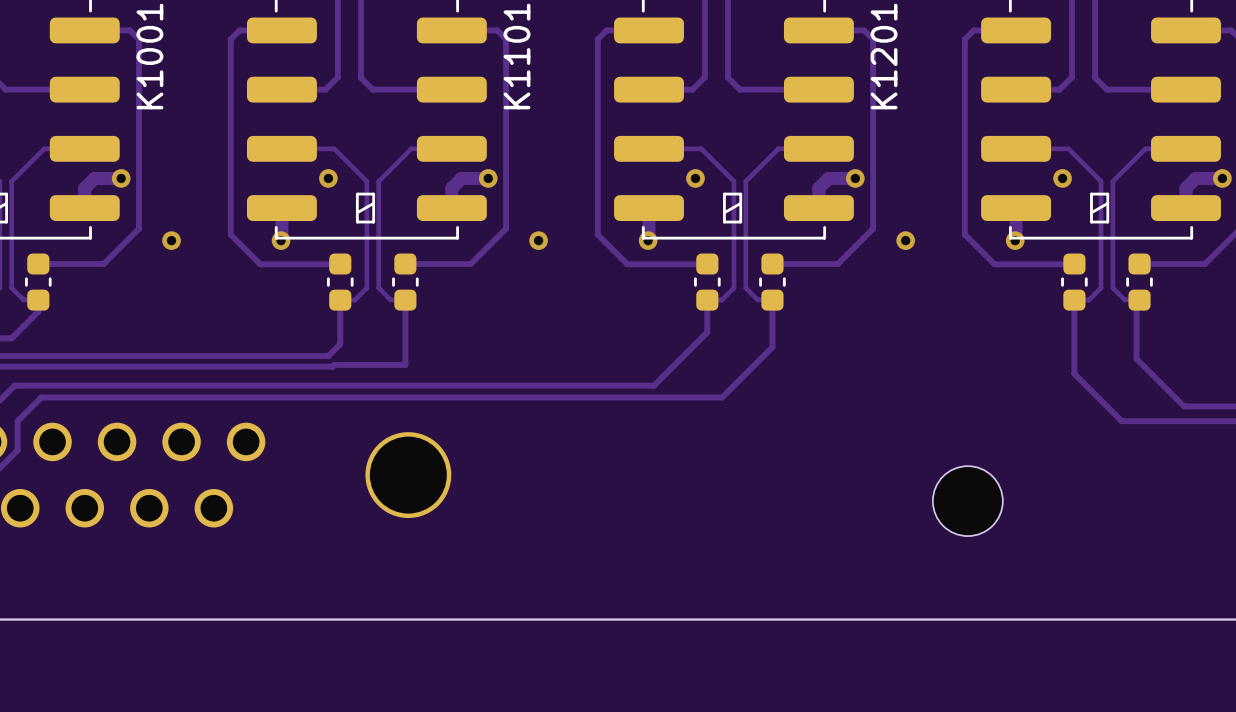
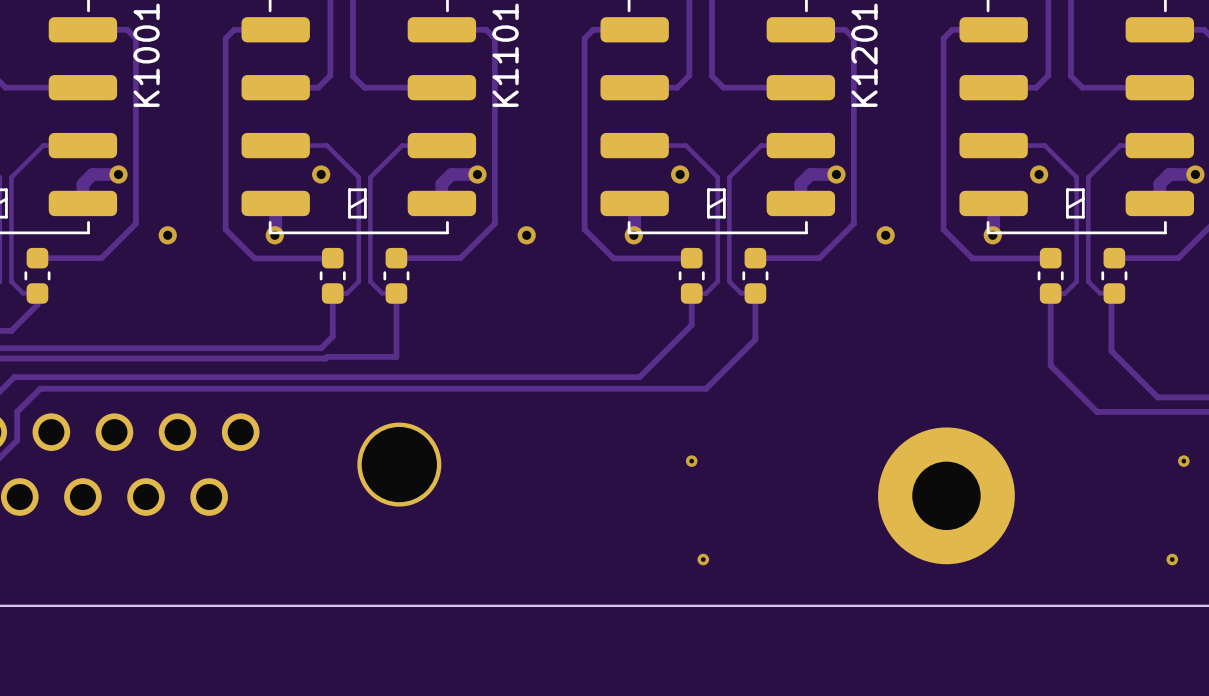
part footprint: [932, 466, 1003, 537] -> [878, 427, 1015, 565]
via: none -> (691, 461)
via: none -> (1183, 461)
via: none -> (703, 559)
via: none -> (1172, 559)

